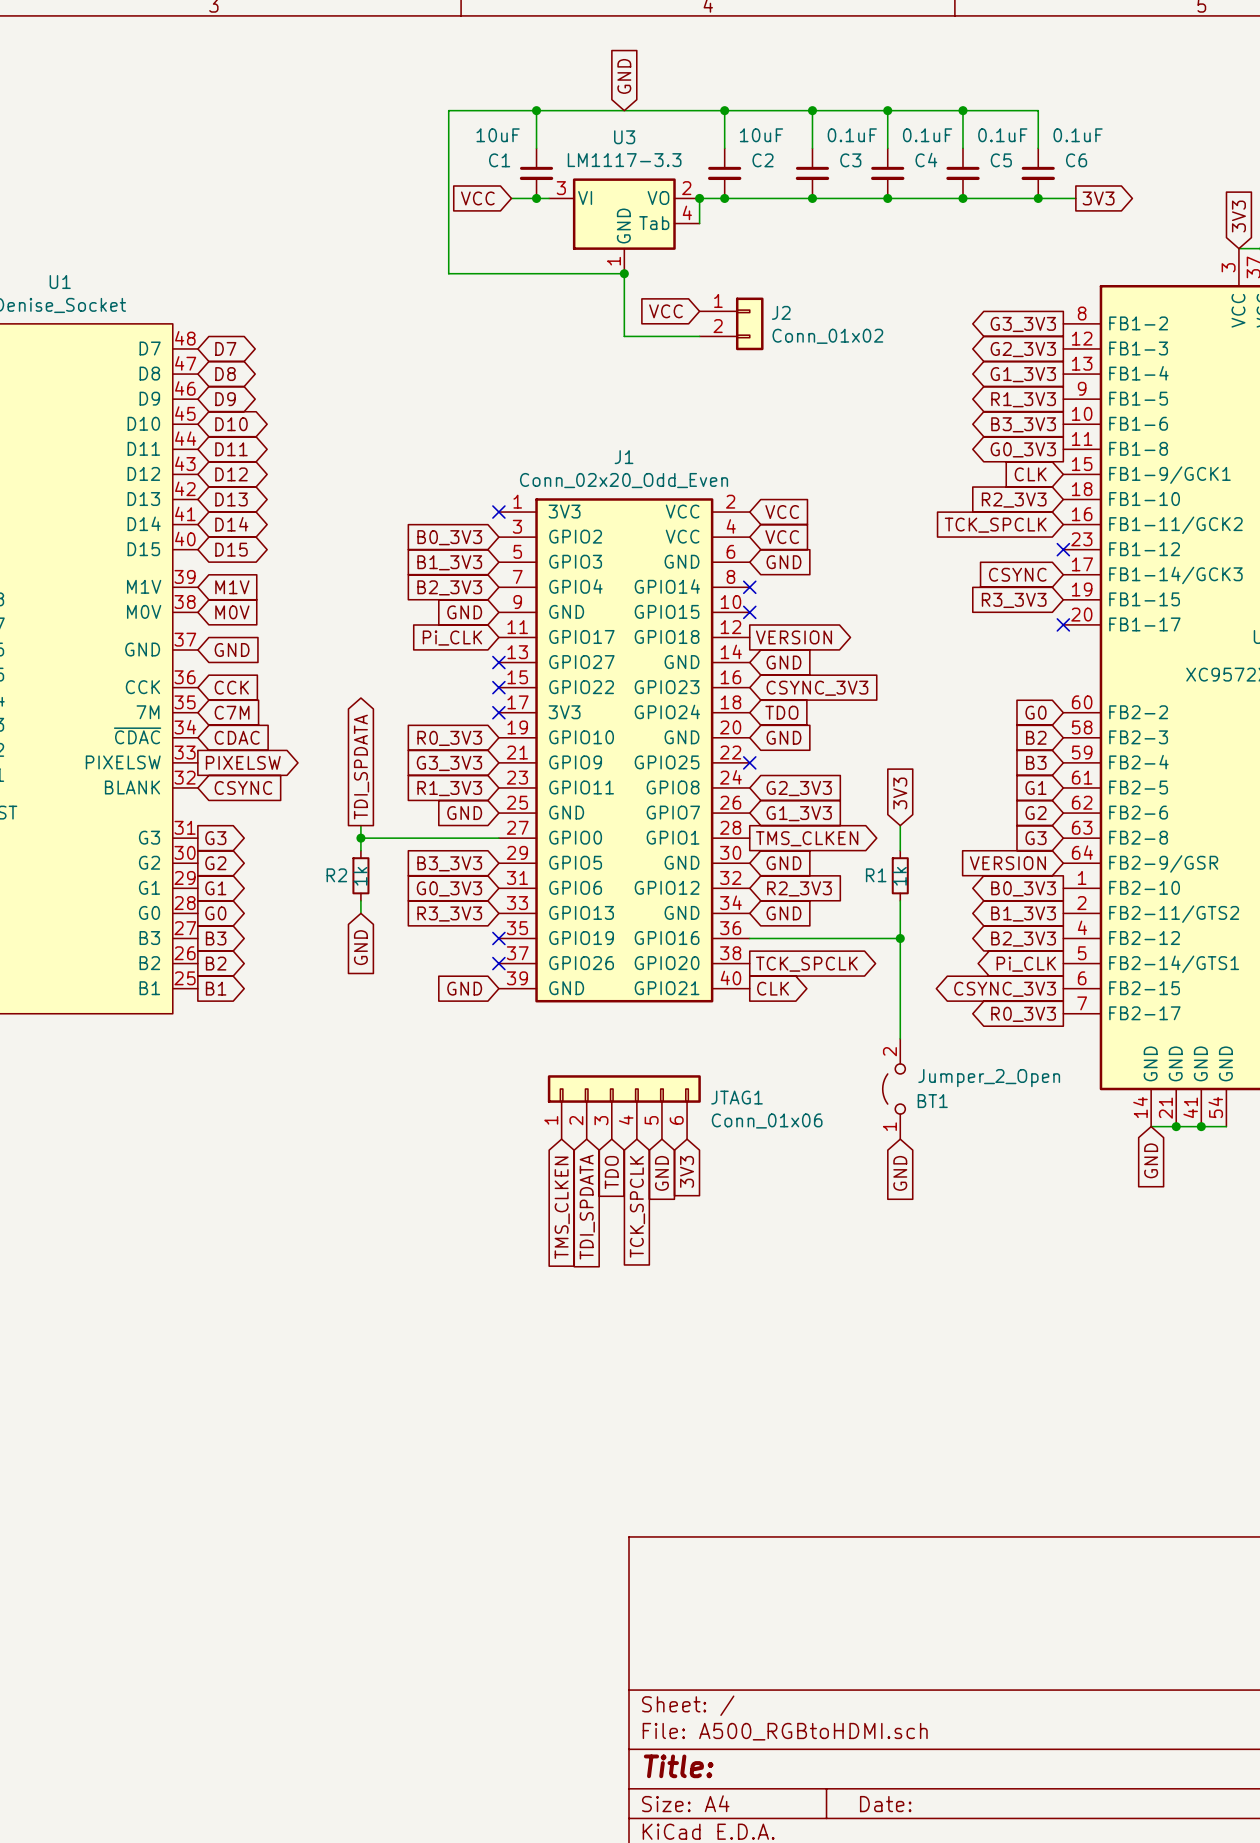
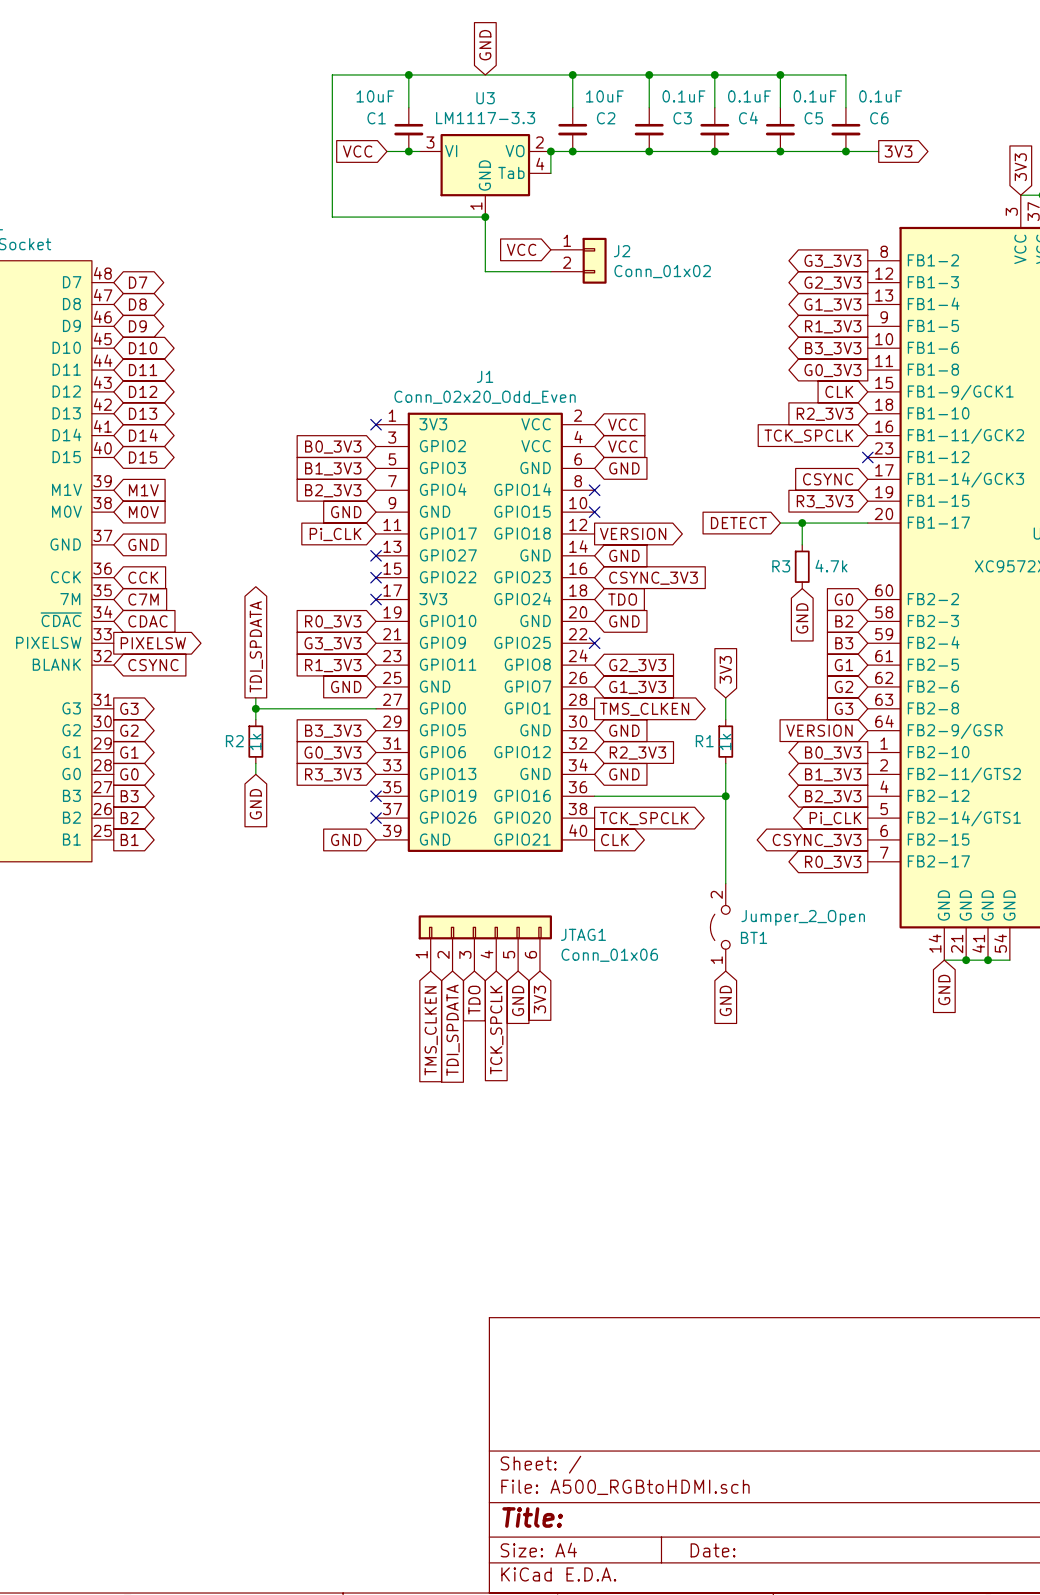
global label: none -> DETECT (738, 523)
wire: none -> (780, 523) (867, 523)
wire: none -> (802, 523) (802, 544)
junction: none -> (802, 523)
no-connect mark: (1063, 624) -> none
R3: none -> 4.7k (802, 566)
global label: none -> GND (802, 618)

